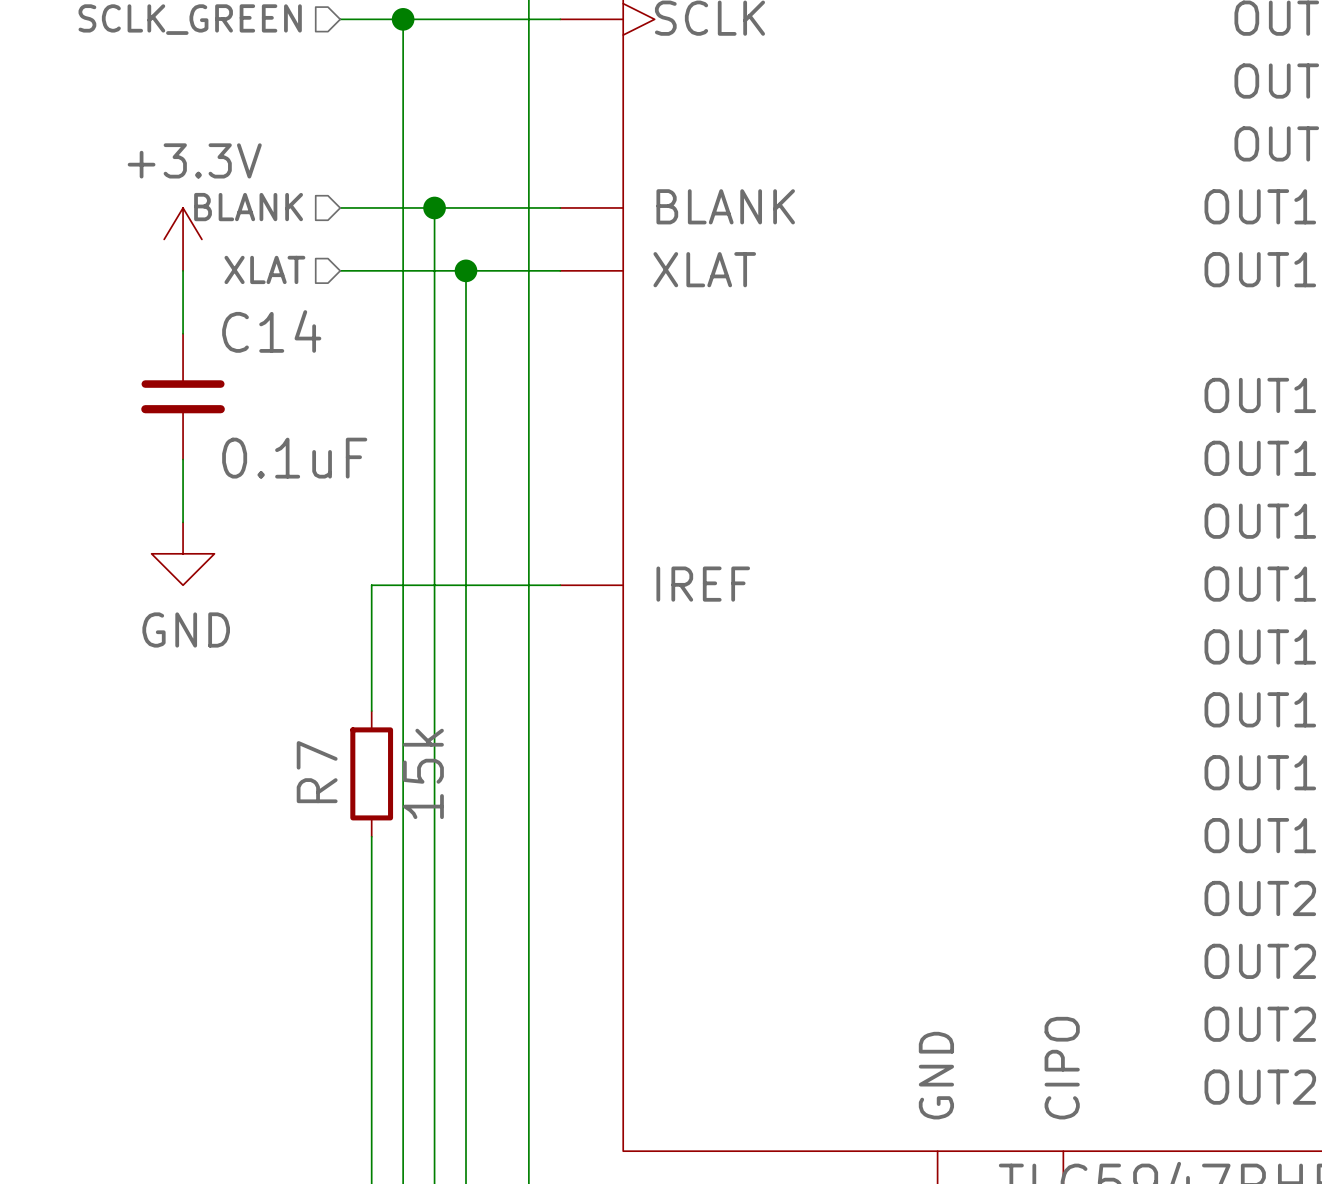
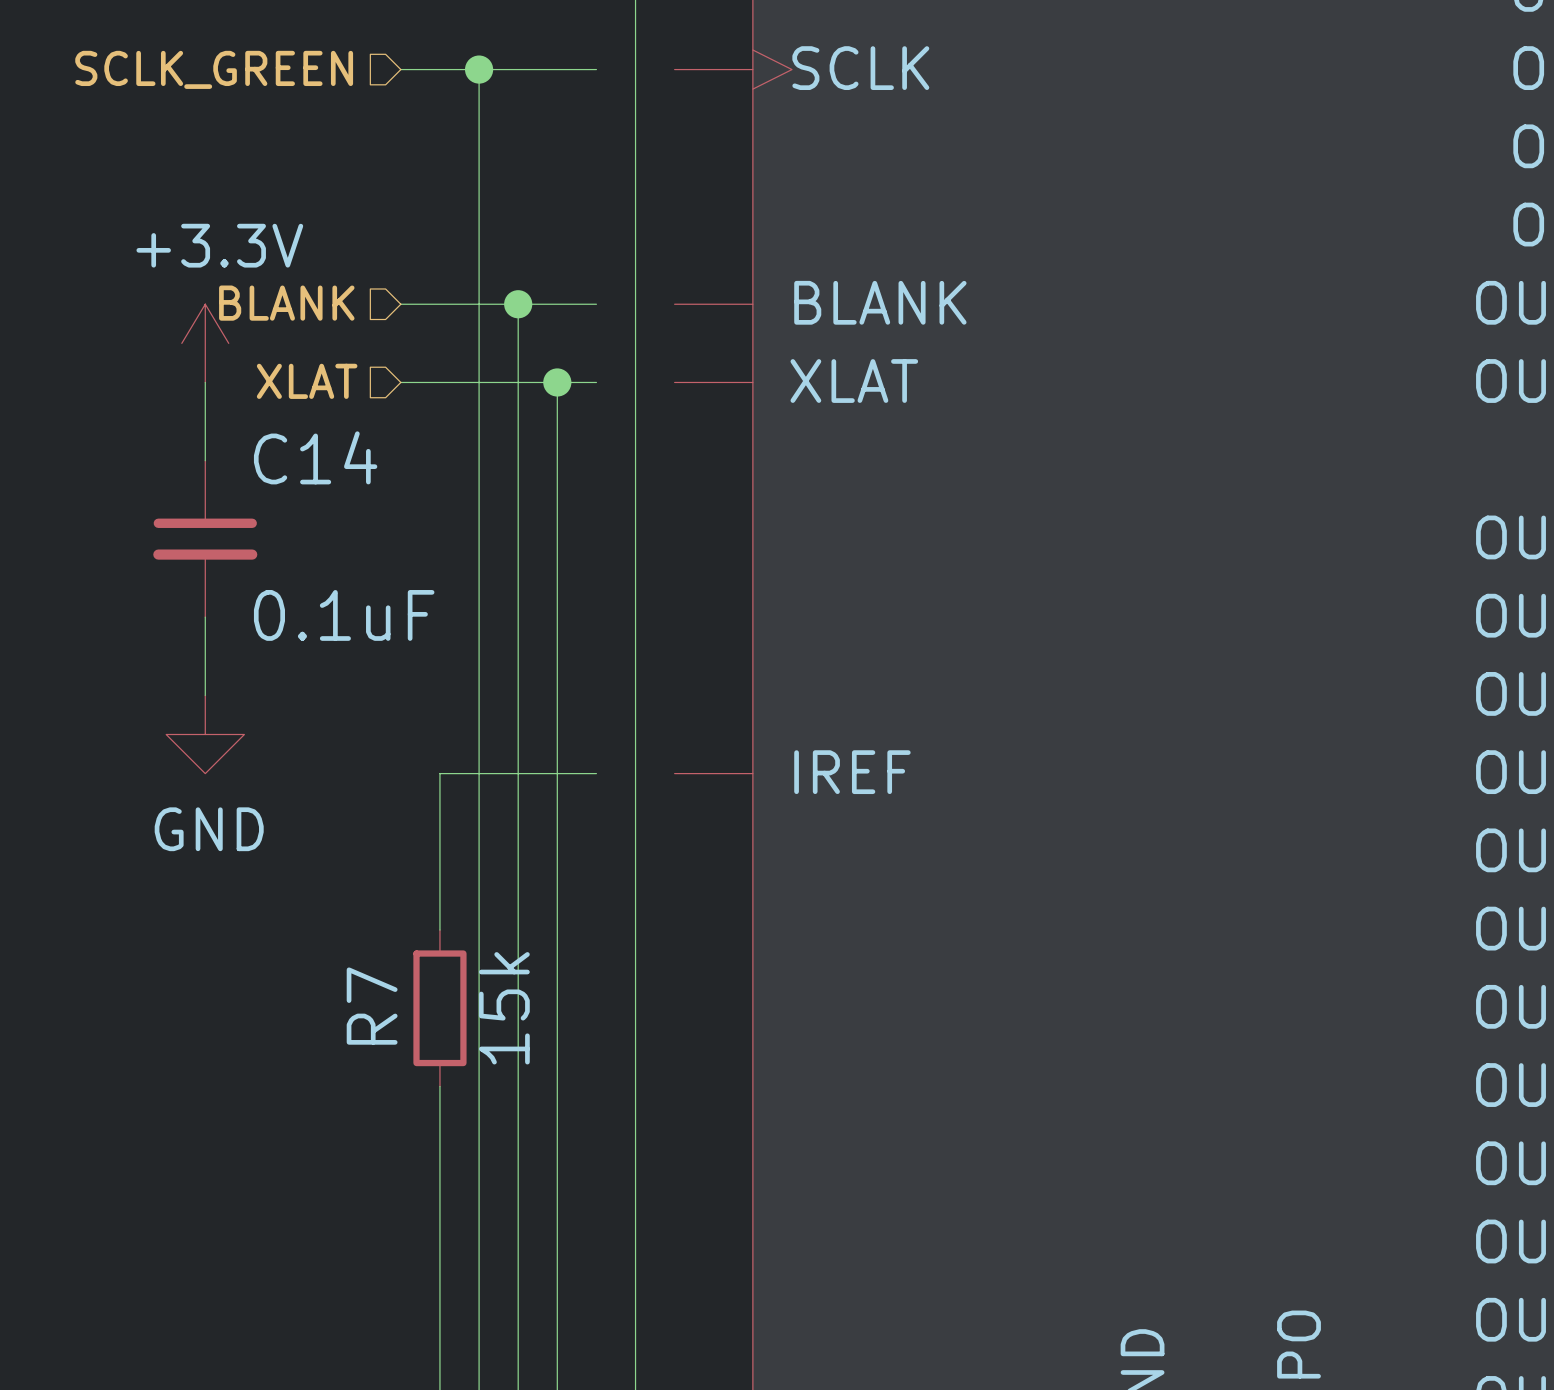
wire: (497, 19) (560, 19) -> none
wire: (497, 207) (560, 207) -> none
wire: (497, 270) (560, 270) -> none
wire: (497, 585) (560, 585) -> none

